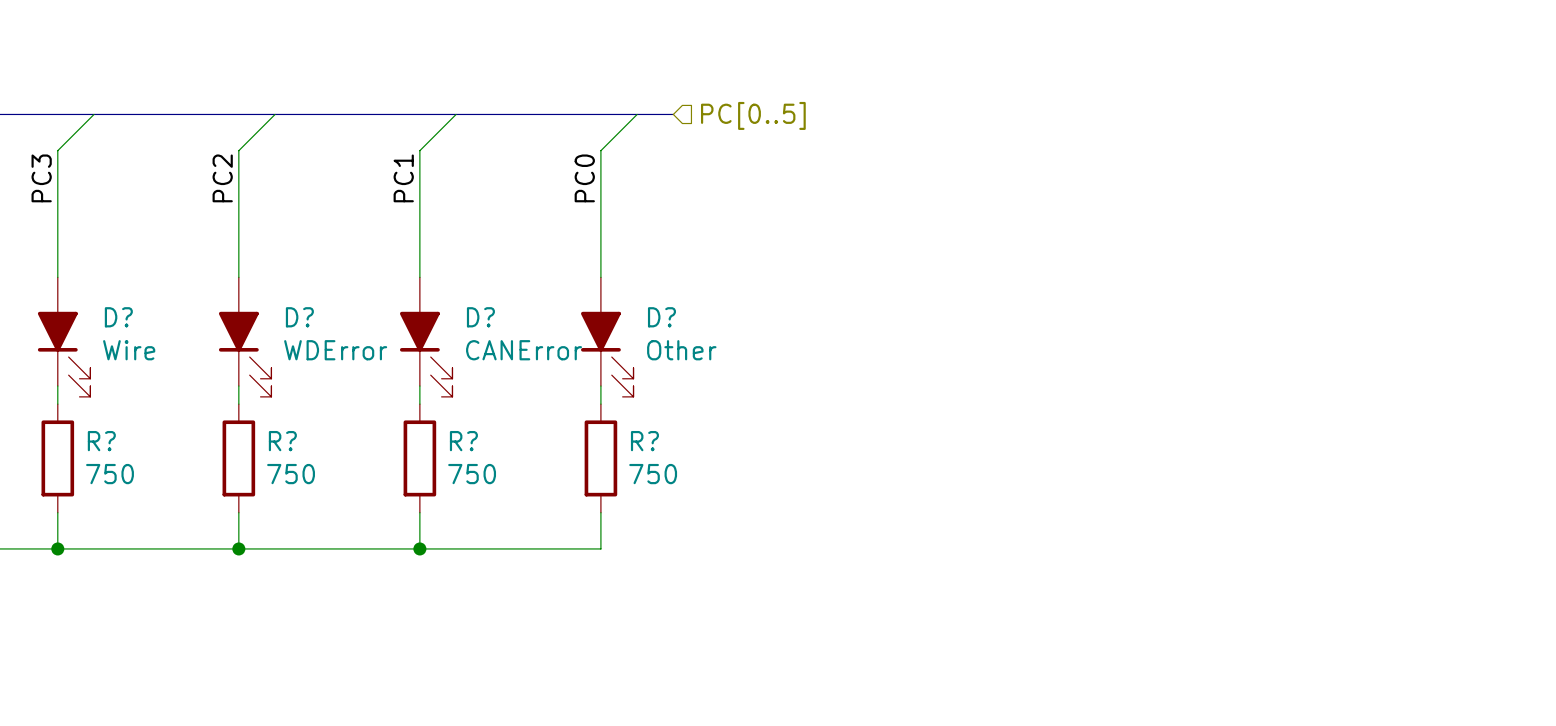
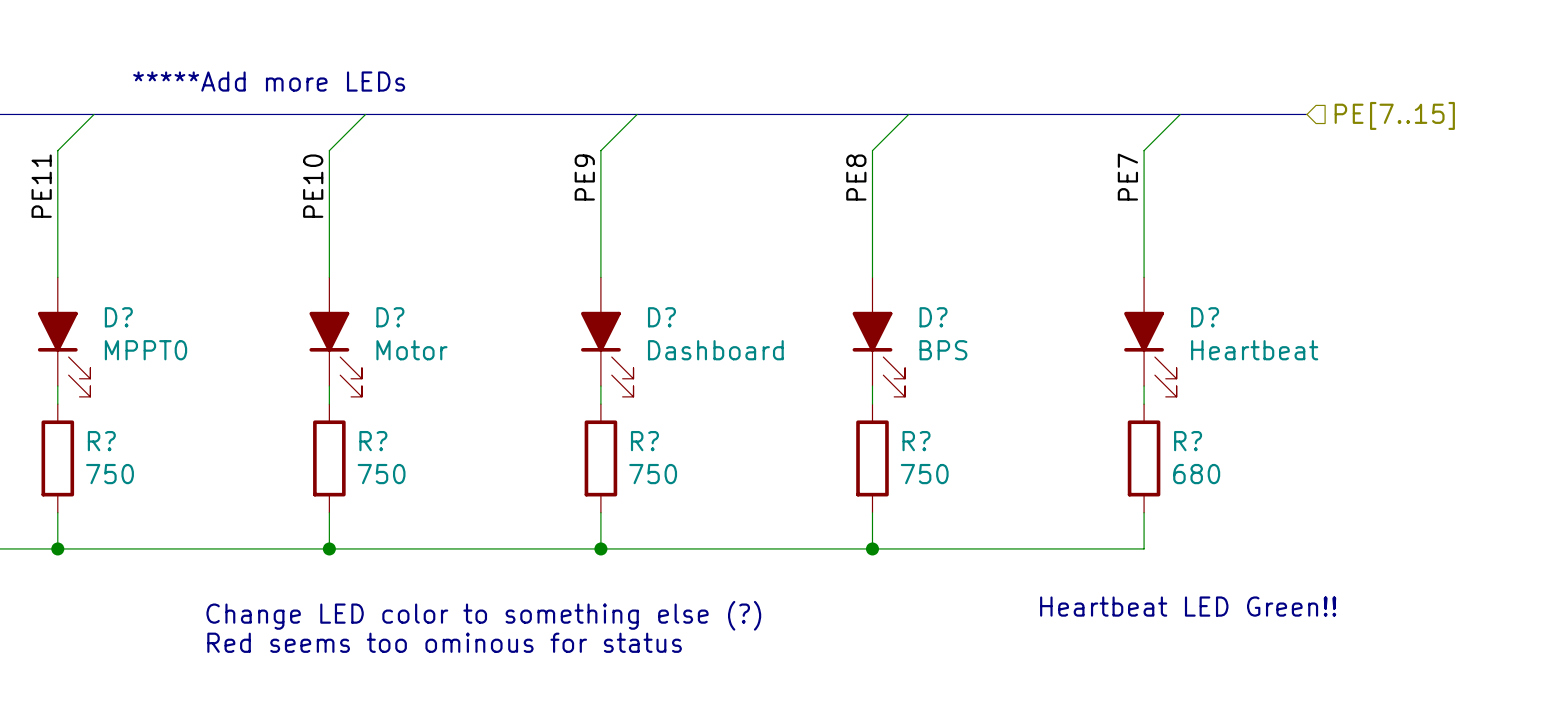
text: none -> *****Add more LEDs (269, 81)
wire: (275, 114) (238, 150) (238, 277) -> (365, 114) (329, 150) (329, 277)
wire: (456, 114) (419, 150) (419, 277) -> none
bus: none -> (673, 114) (1306, 114)
wire: none -> (908, 114) (872, 150) (872, 277)
wire: none -> (1180, 114) (1144, 150) (1144, 277)
hierarchical label: PC[0..5] (753, 115) -> none
hierarchical label: none -> PE[7..15] (1394, 115)
label: none -> PE8 (856, 177)
label: none -> PE7 (1127, 177)
label: PC3 (41, 178) -> PE11 (41, 186)
label: PC2 (222, 178) -> none
label: PC1 (403, 178) -> none
label: PC0 (584, 178) -> PE9 (584, 177)
label: none -> PE10 (313, 186)
D?: WDError (245, 337) -> none
D?: none -> Motor (335, 337)
D?: CANError (426, 337) -> none
D?: none -> BPS (878, 337)
D?: none -> Heartbeat (1150, 337)
D? value: Wire (129, 350) -> MPPT0 (145, 350)
D? value: Other (681, 350) -> Dashboard (715, 350)
wire: (238, 386) (238, 404) -> (329, 386) (329, 404)
wire: (419, 386) (419, 404) -> none
wire: none -> (872, 386) (872, 404)
wire: none -> (1144, 386) (1144, 404)
R?: 750 (238, 458) -> none
R?: none -> 750 (329, 458)
R?: 750 (419, 458) -> none
R?: none -> 750 (872, 458)
R?: none -> 680 (1144, 458)
wire: (238, 512) (238, 548) -> (329, 512) (329, 548)
wire: (419, 512) (419, 548) -> none
wire: none -> (872, 512) (872, 548)
wire: none -> (1144, 512) (1144, 548) (600, 548)
junction: (238, 548) -> none
junction: none -> (329, 548)
junction: (419, 548) -> none
junction: none -> (600, 548)
junction: none -> (872, 548)
text: none -> Heartbeat LED Green!! (1188, 606)
text: none -> Change LED color to something else (?) (483, 615)
text: none -> Red seems too ominous for status (444, 642)

